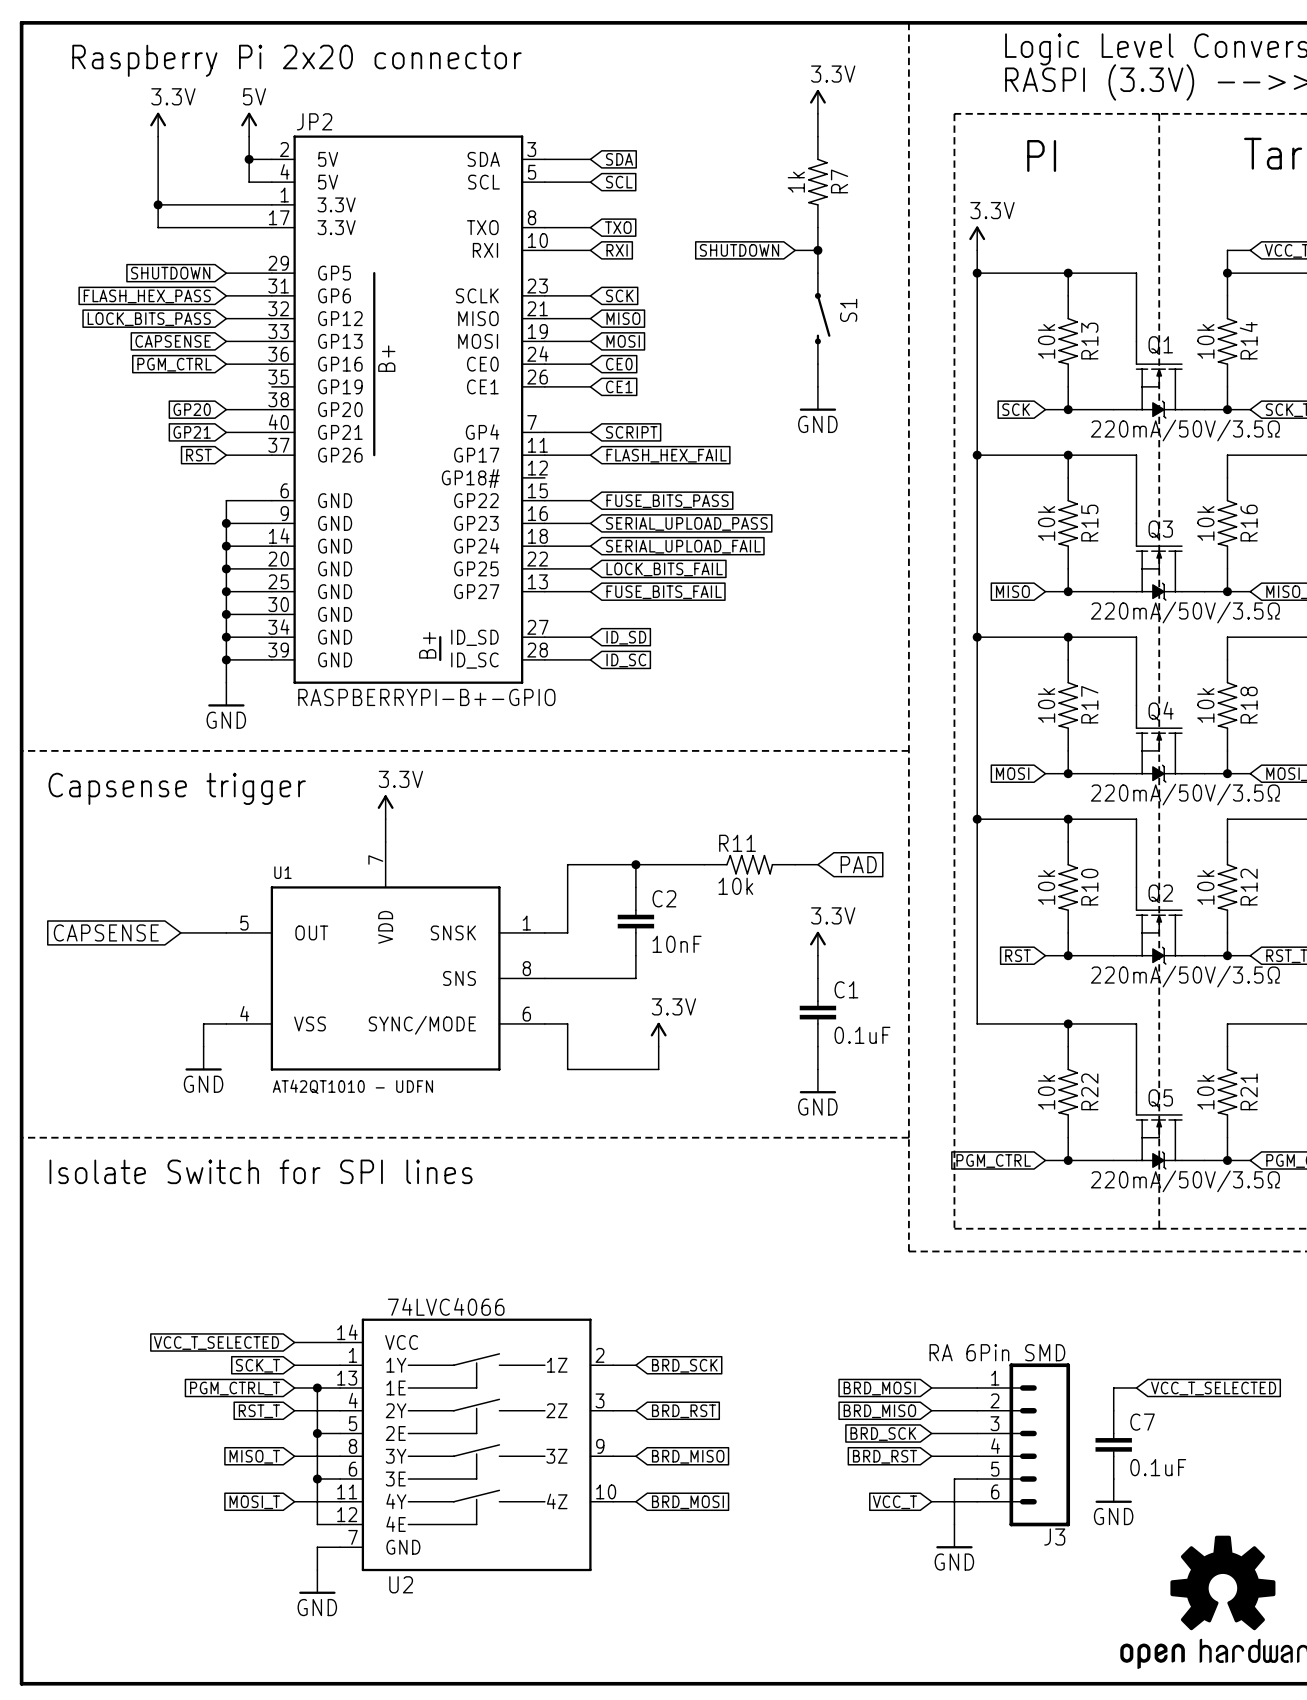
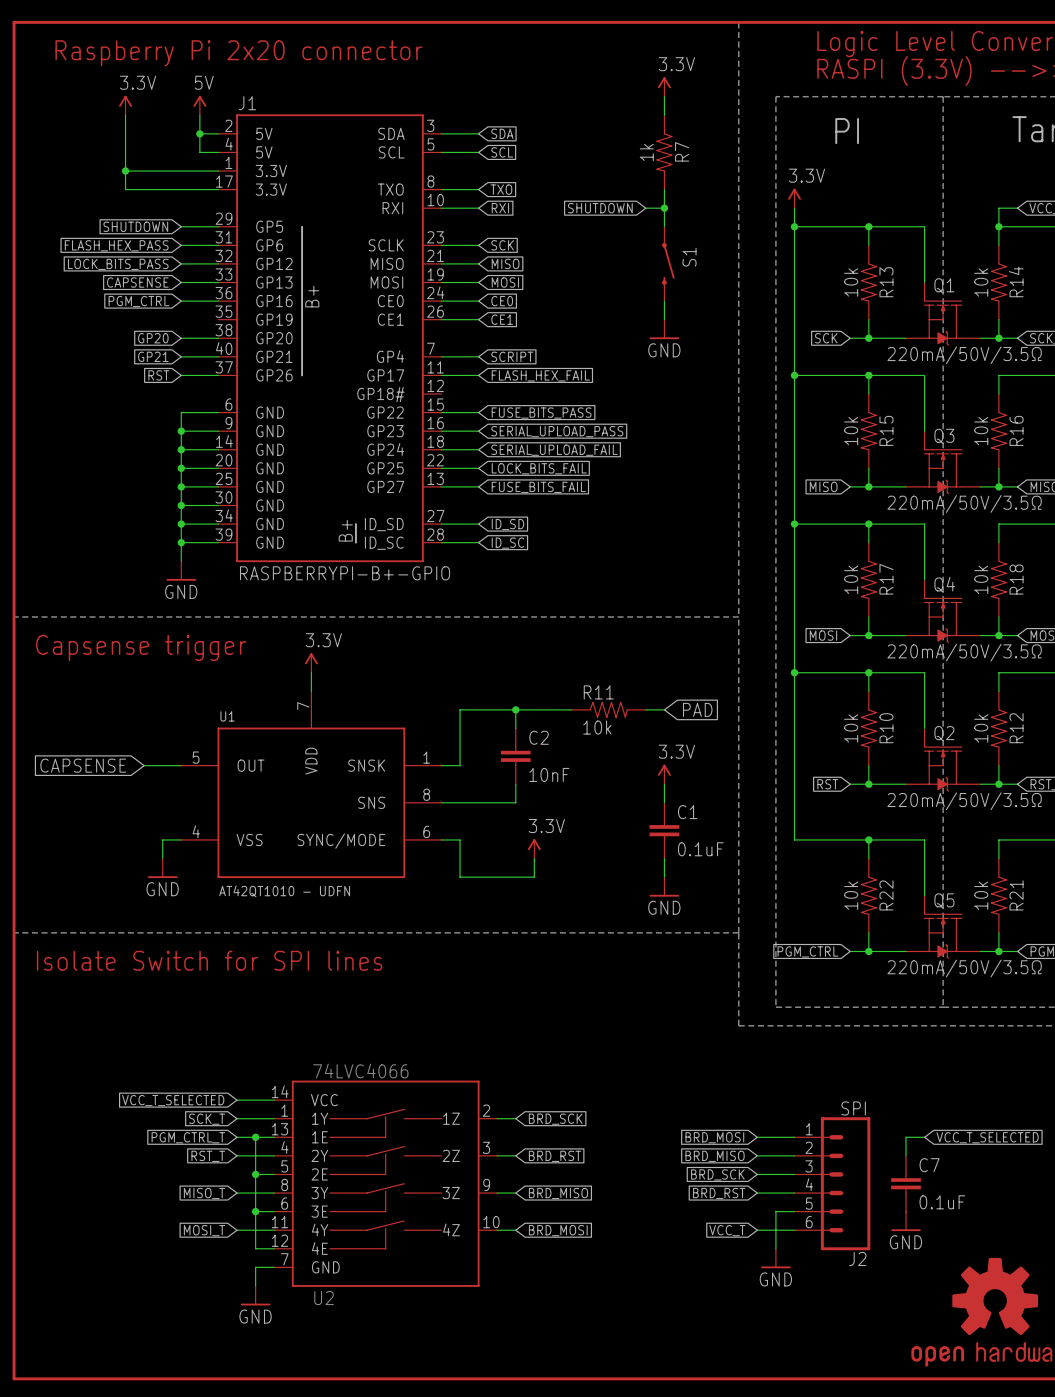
JP2 name: JP2 (314, 121) -> J1 (247, 103)
J3 value: RA 6Pin SMD (997, 1352) -> SPI (853, 1108)
J3 name: J3 (1054, 1537) -> J2 (857, 1259)

